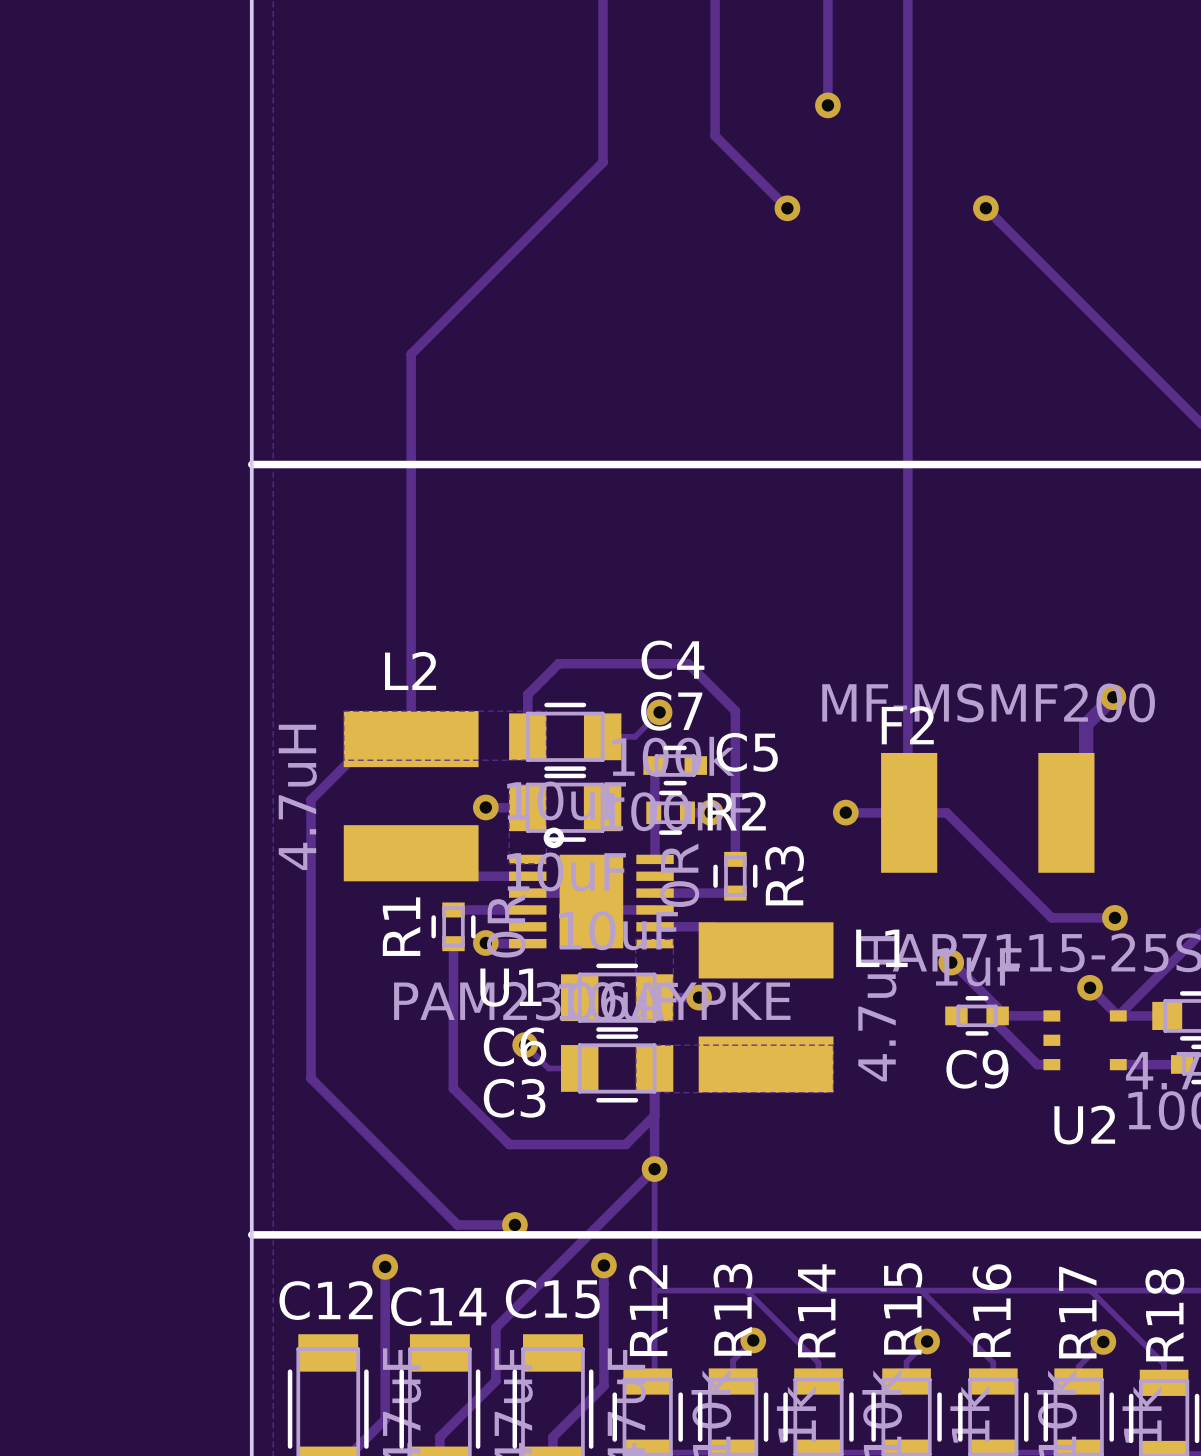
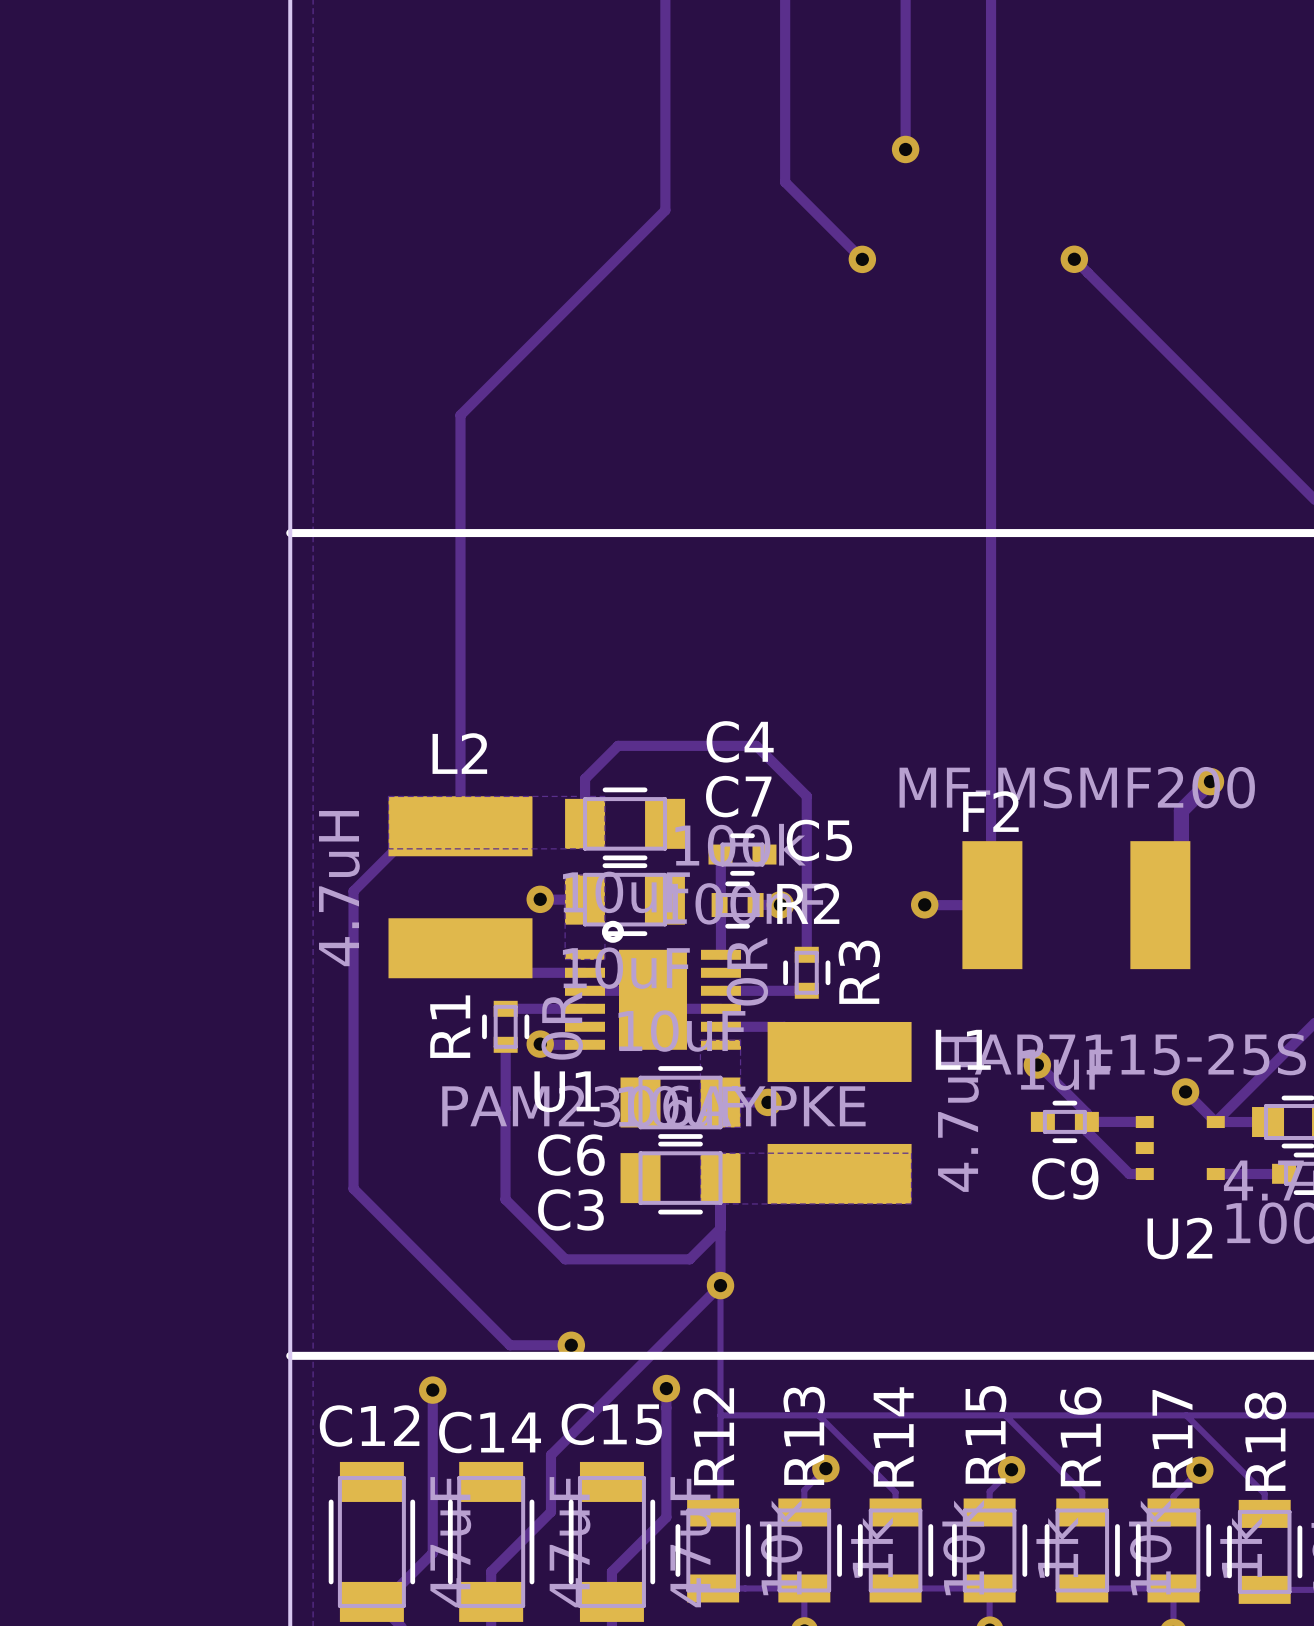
track: (659, 712) (635, 736) (602, 736) -> none
via: (659, 712) -> none
track: (909, 812) (946, 812) (1051, 917) (1114, 917) -> none
via: (1114, 917) -> none
track: (525, 1045) (548, 1068) (579, 1068) -> none
via: (525, 1045) -> none

